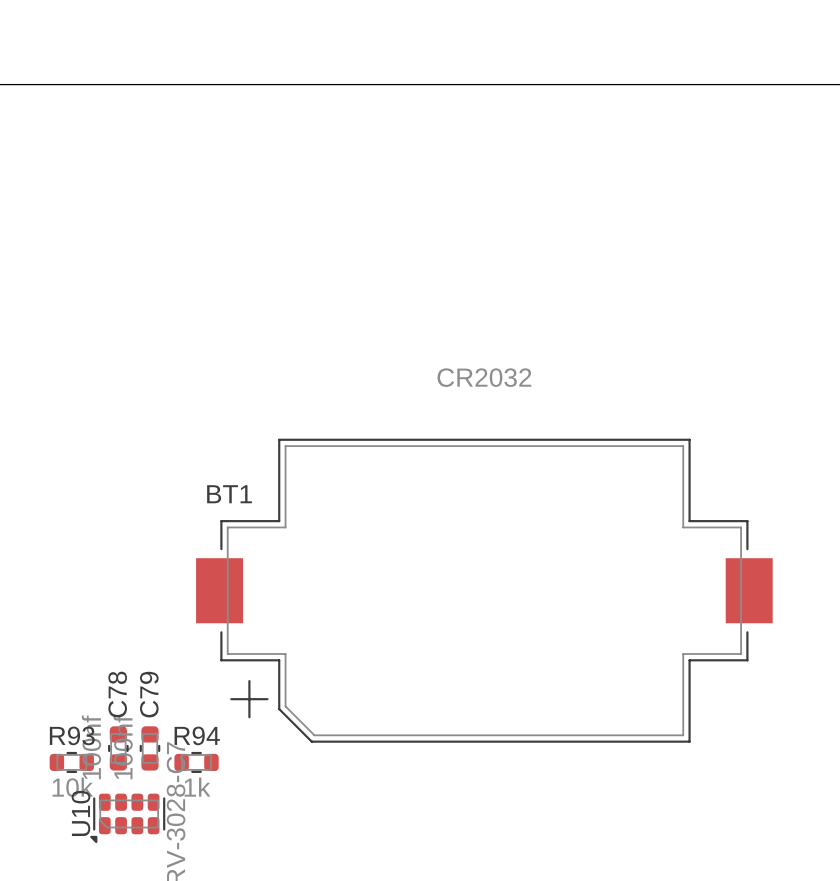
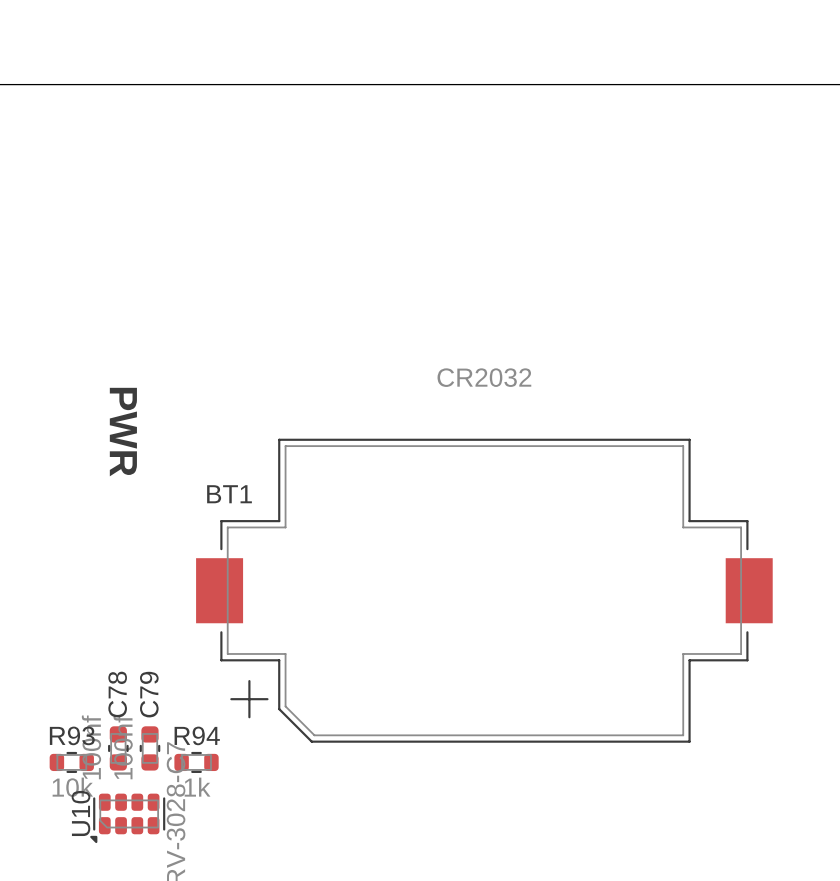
text: none -> PWR (123, 432)

